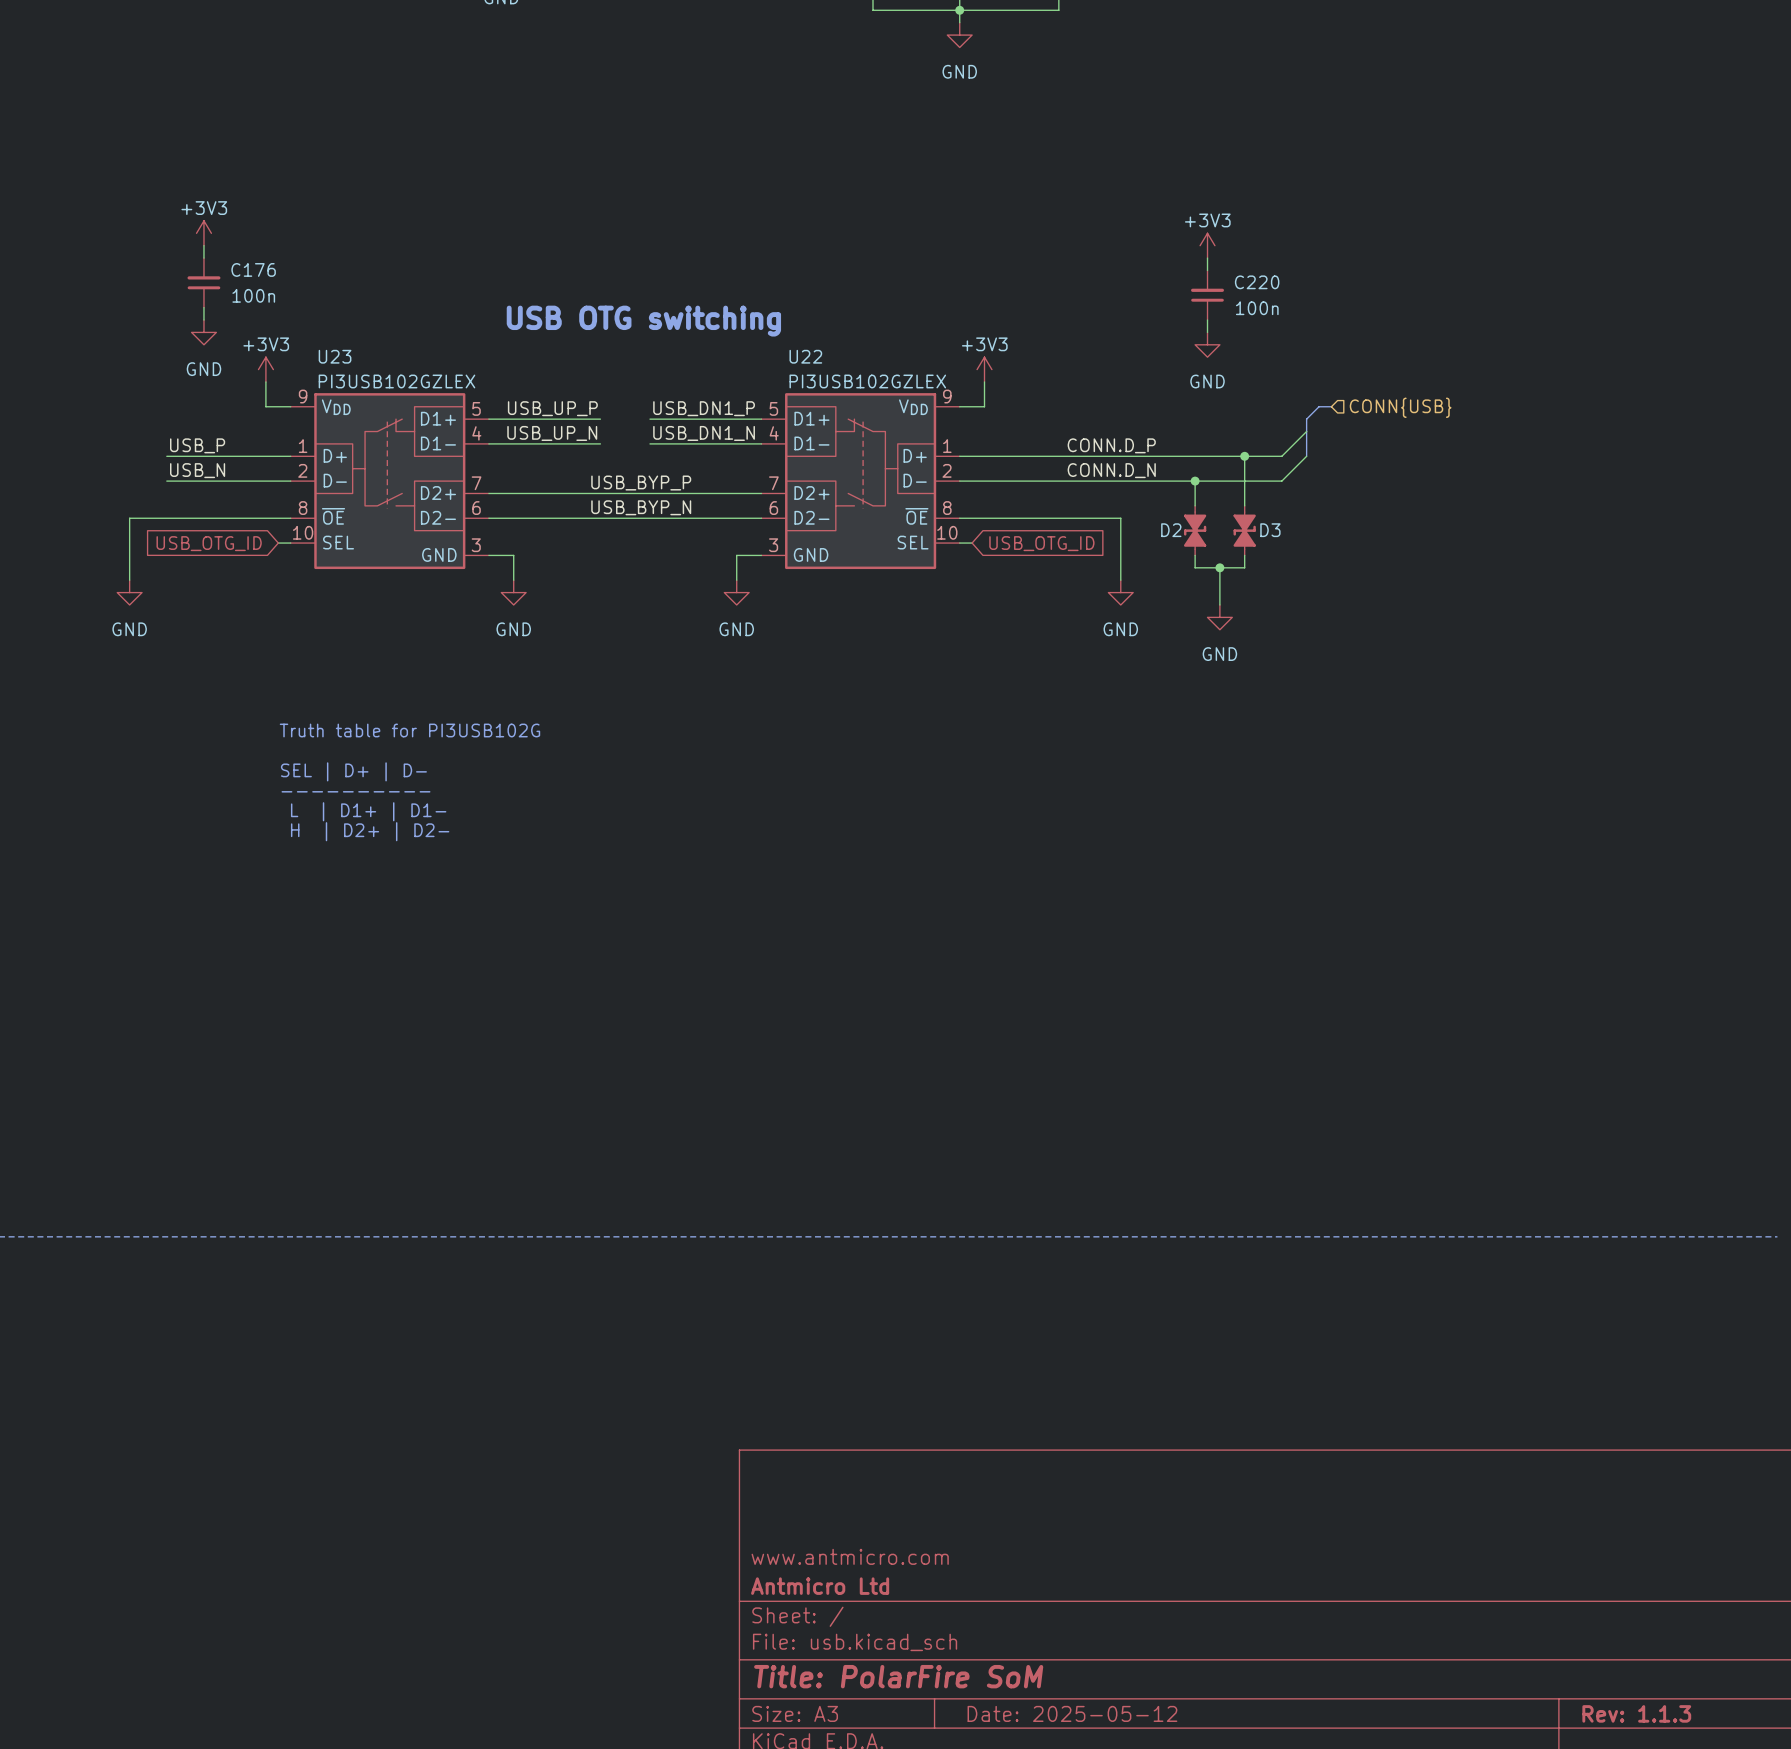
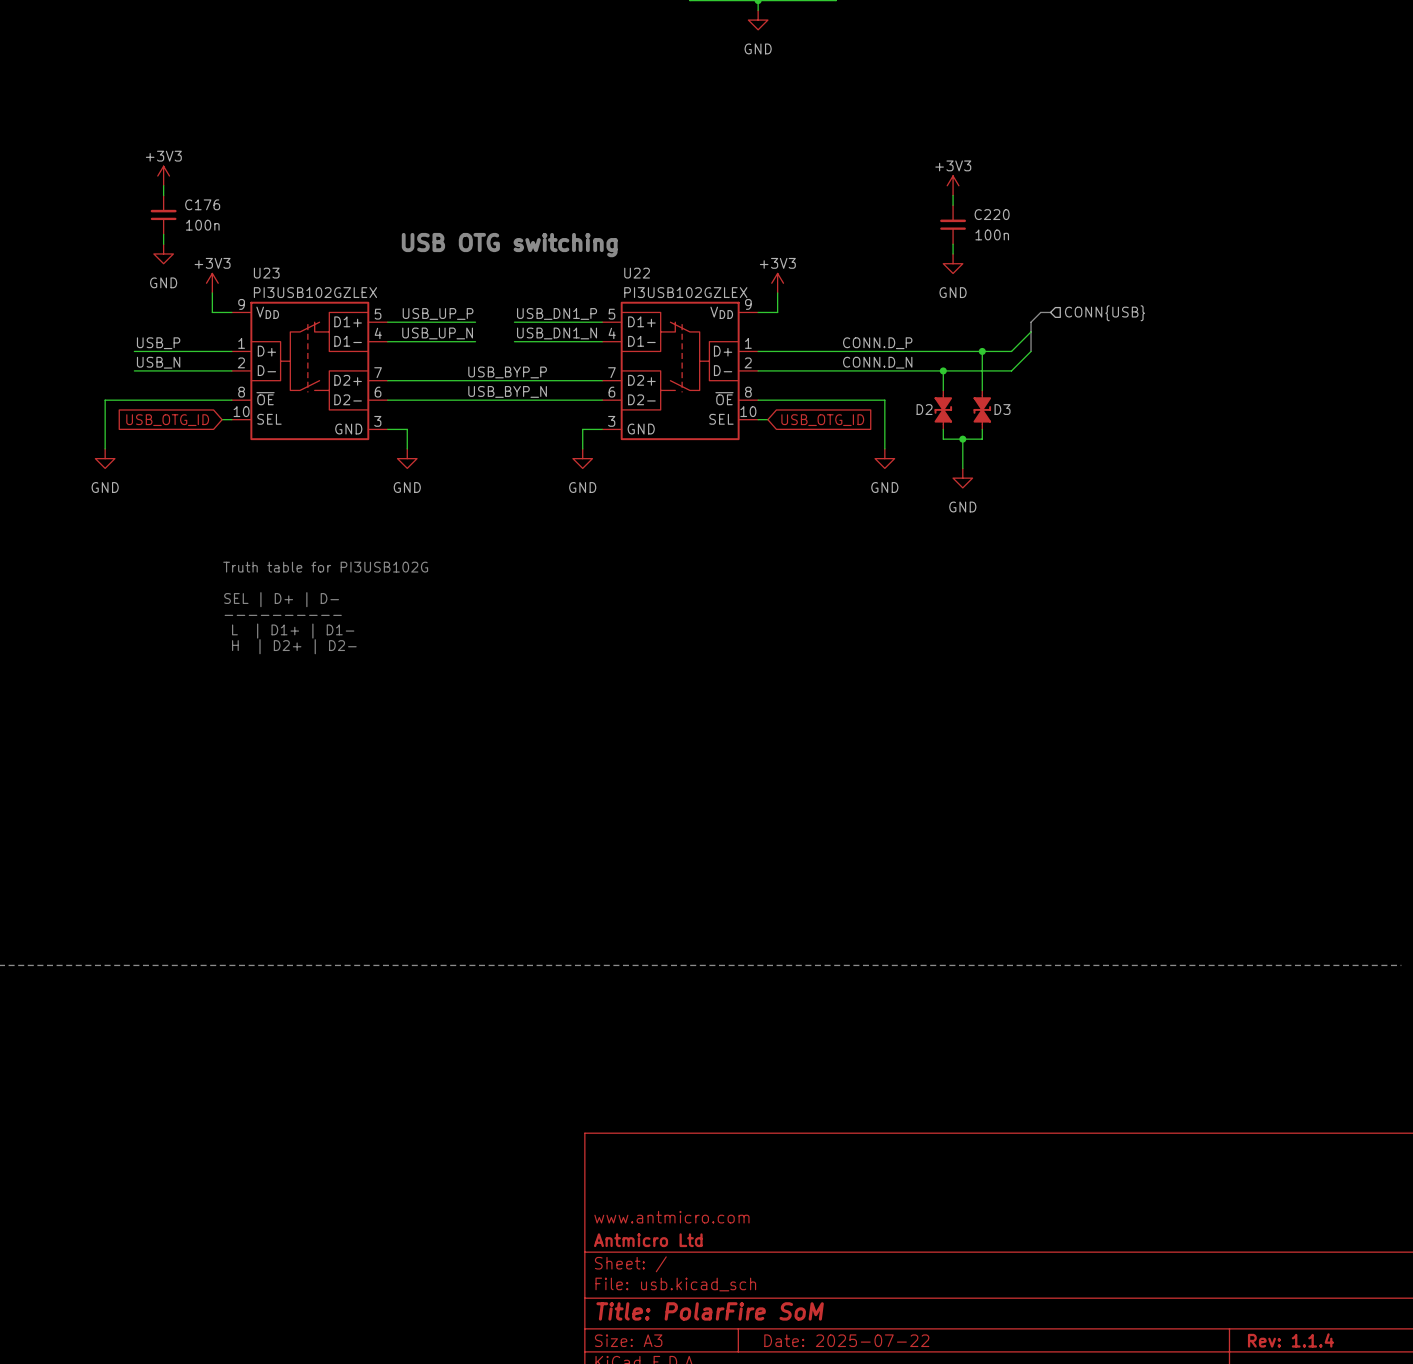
title block: Date: 2025-05-12 (1072, 1713) -> Date: 2025-07-22 (846, 1340)
title block: Rev: 1.1.3 (1636, 1713) -> Rev: 1.1.4 (1291, 1340)

